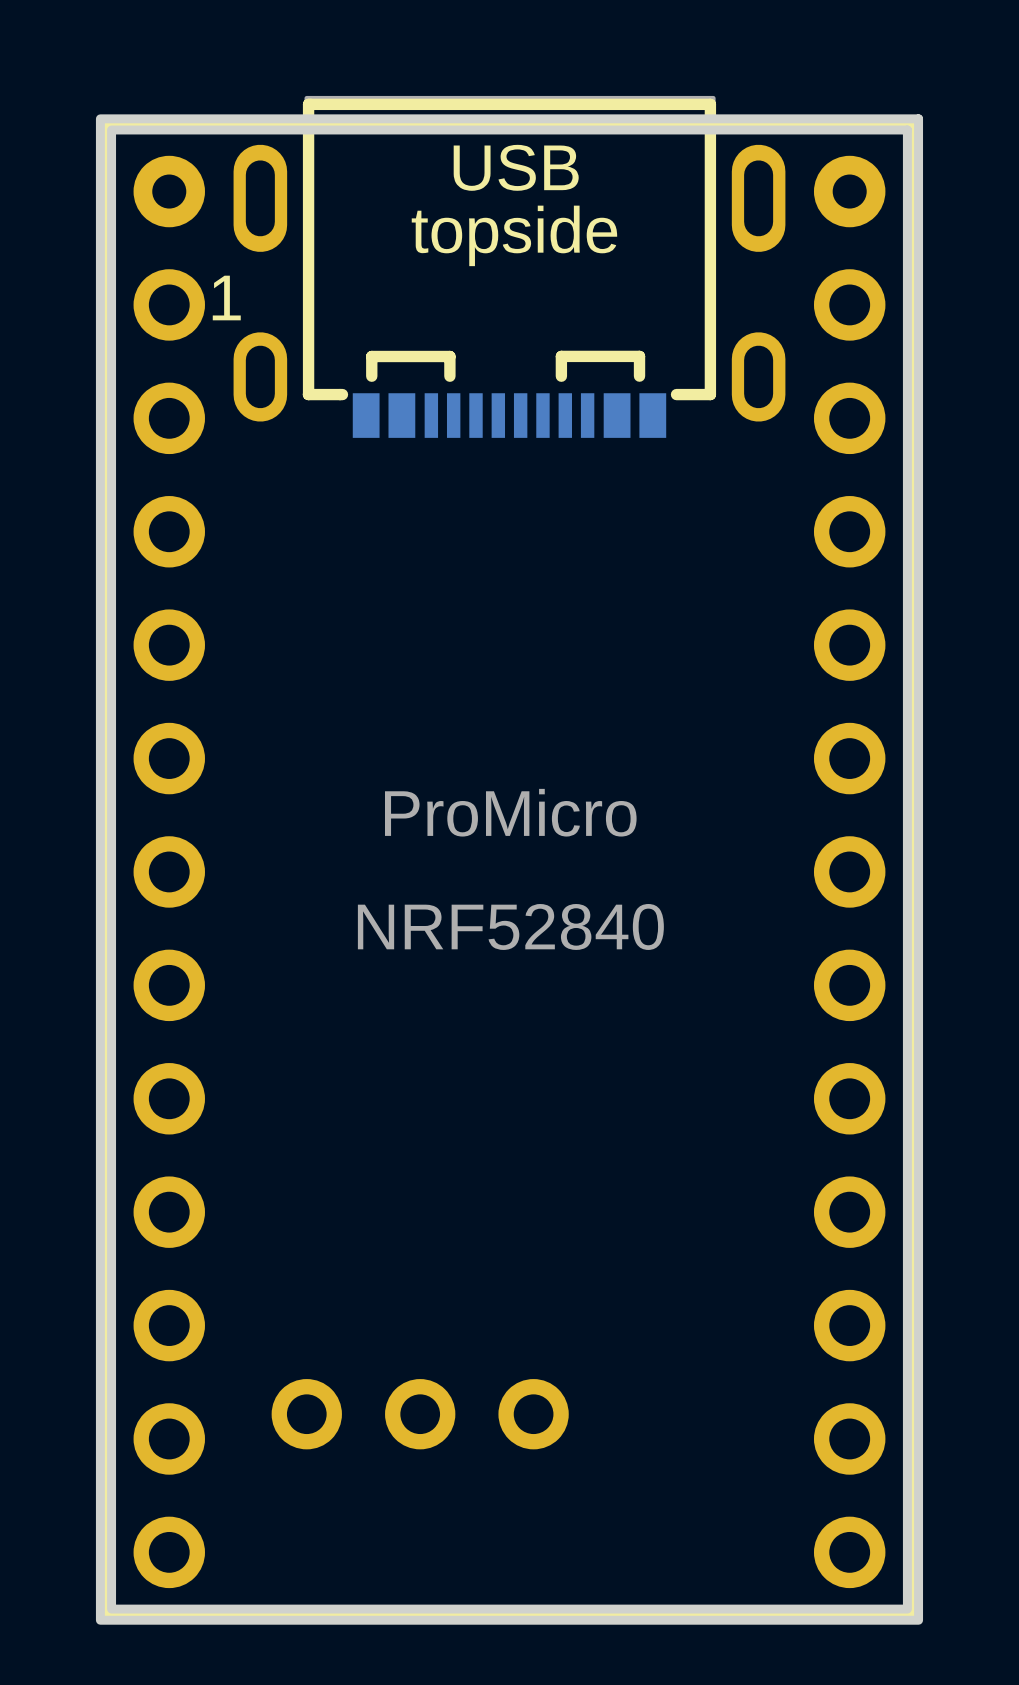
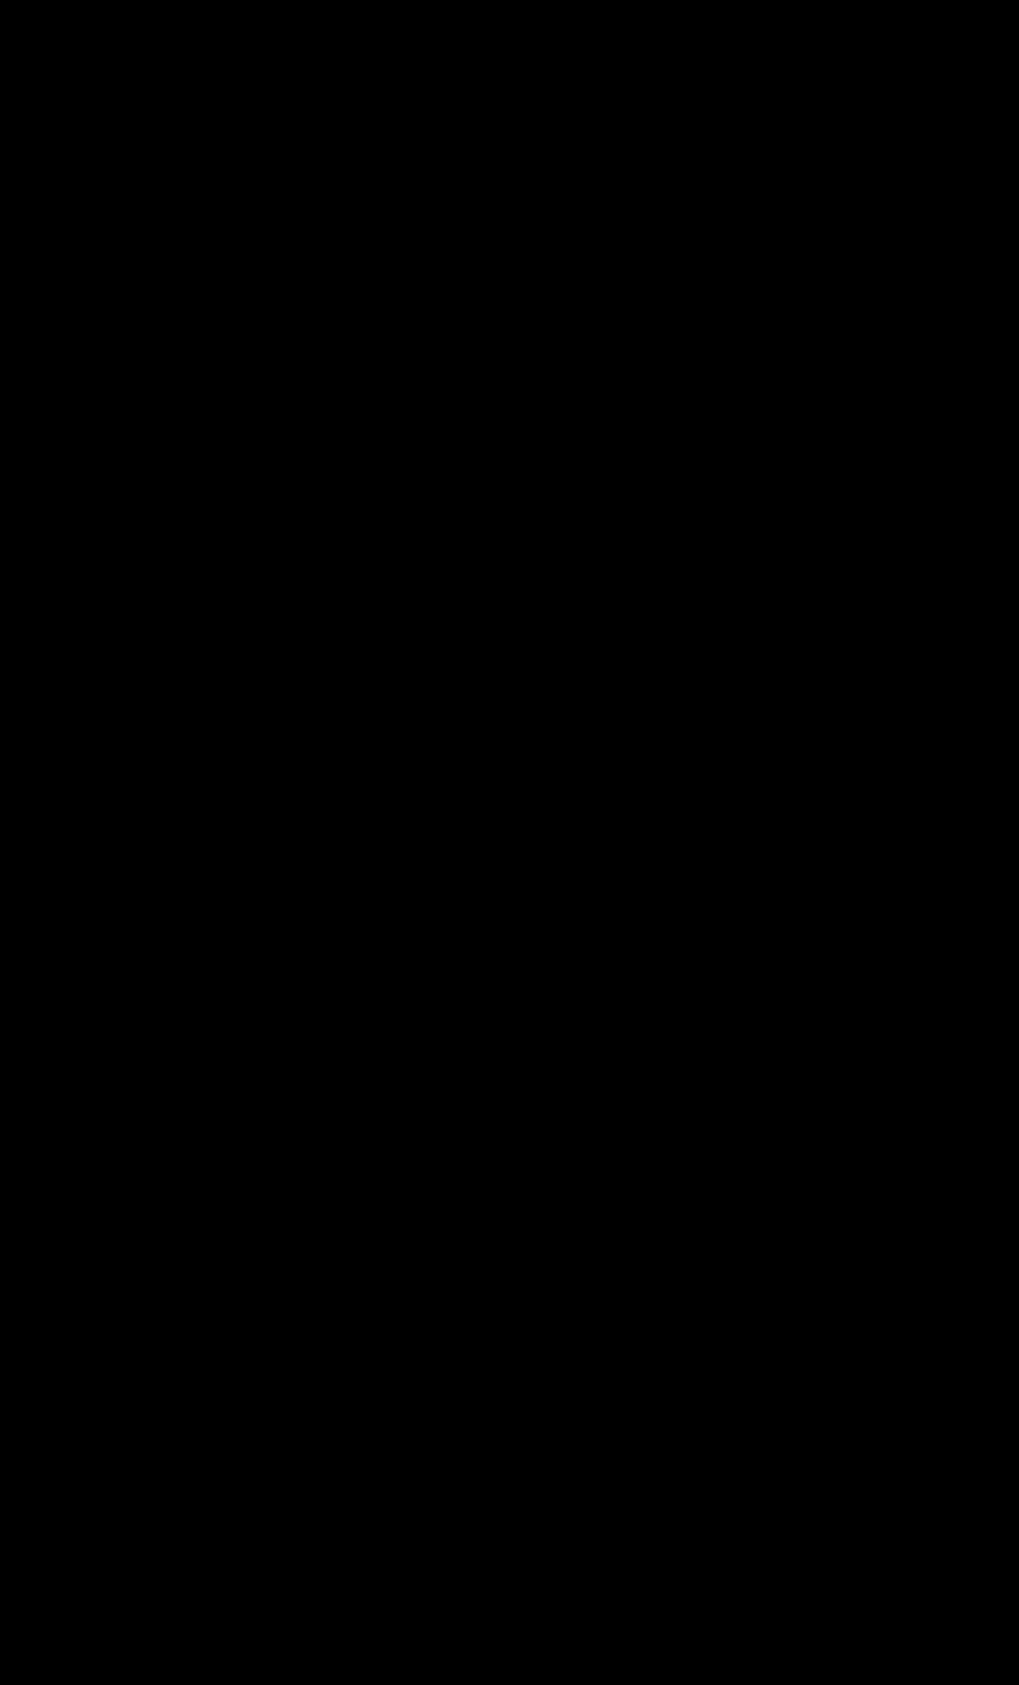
part: ProMicro (509, 860) -> none

